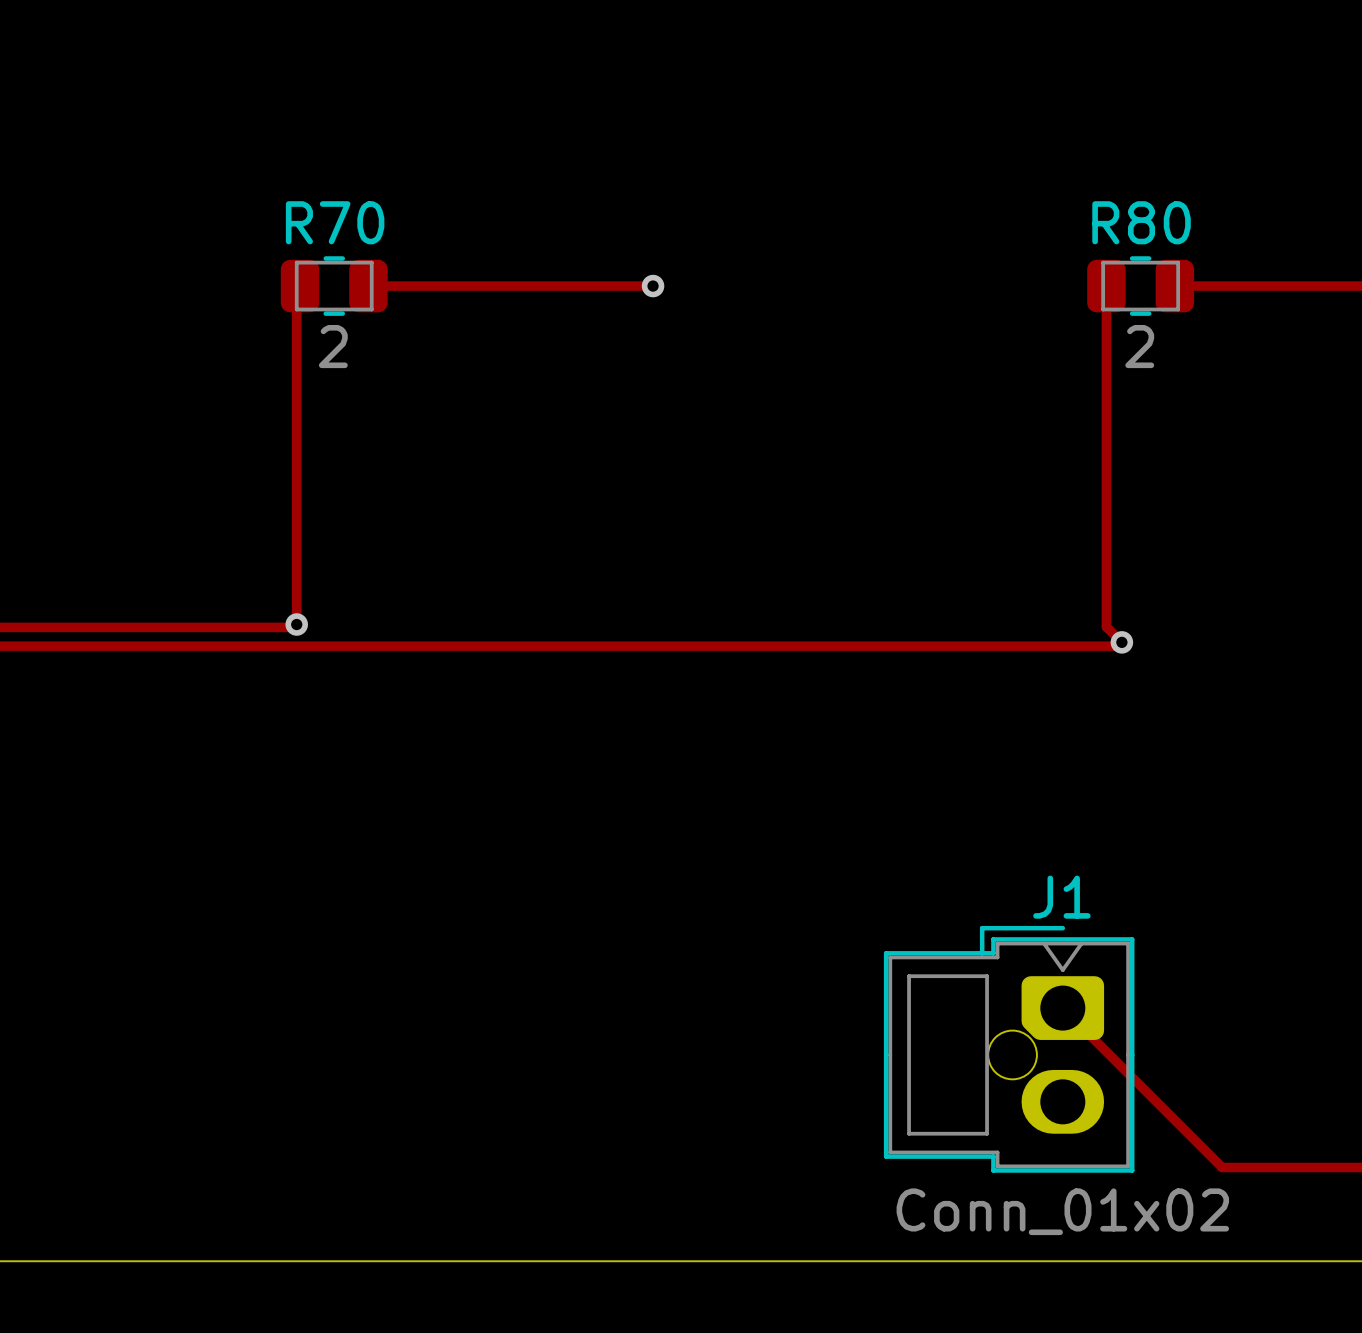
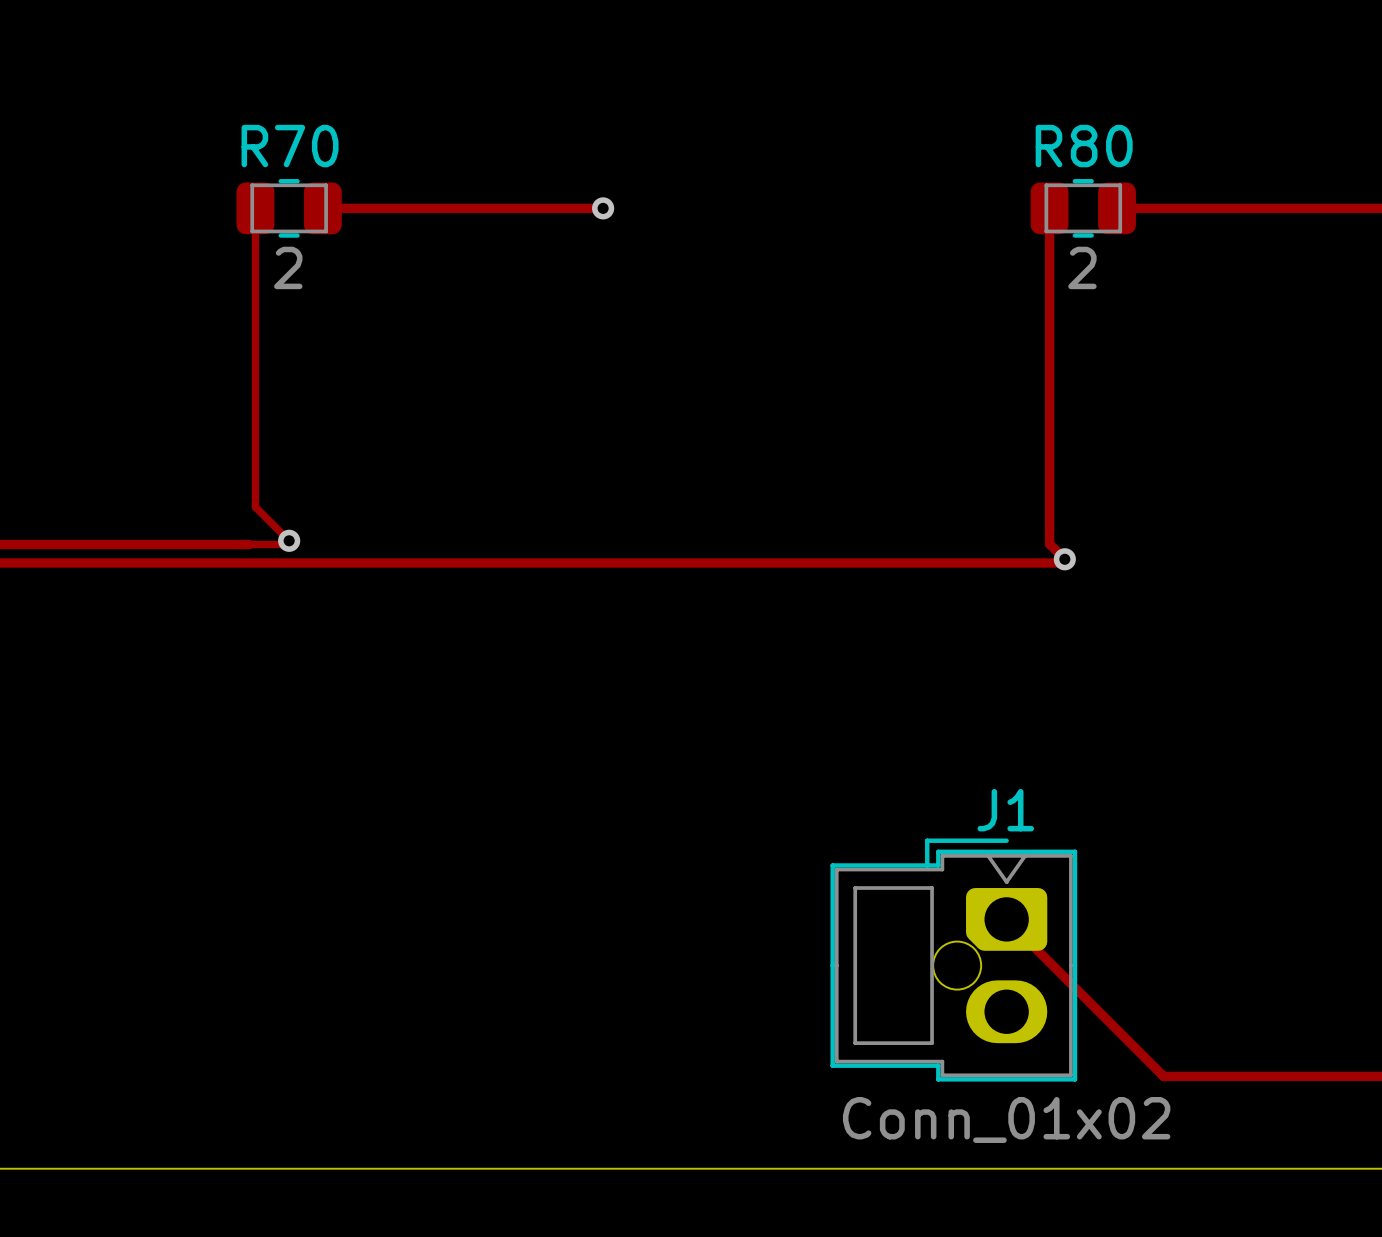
track: (300, 286) (296, 289) (296, 624) (293, 627) -> (255, 208) (255, 507) (289, 540) (285, 544) (249, 544)
via position: (296, 624) -> (289, 540)

